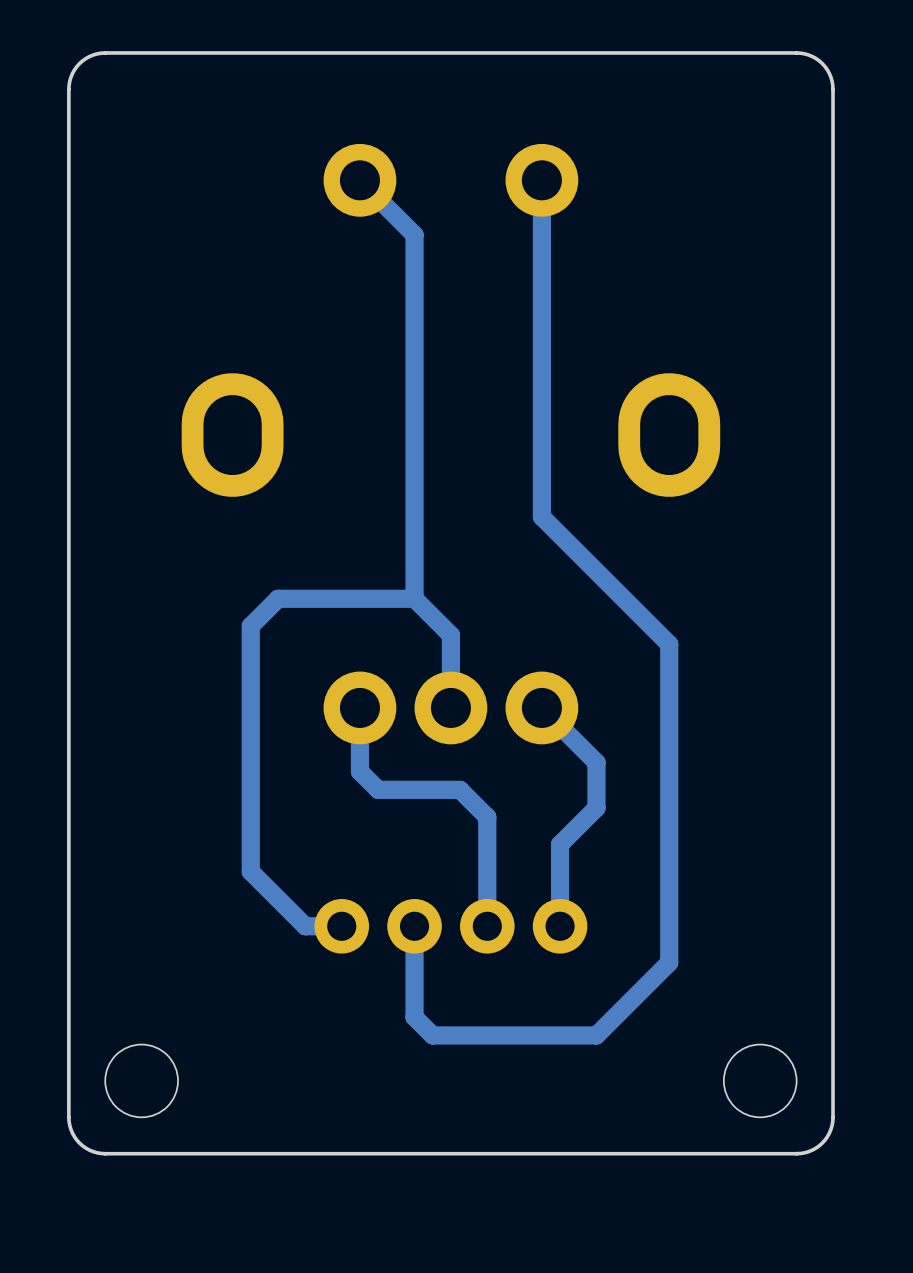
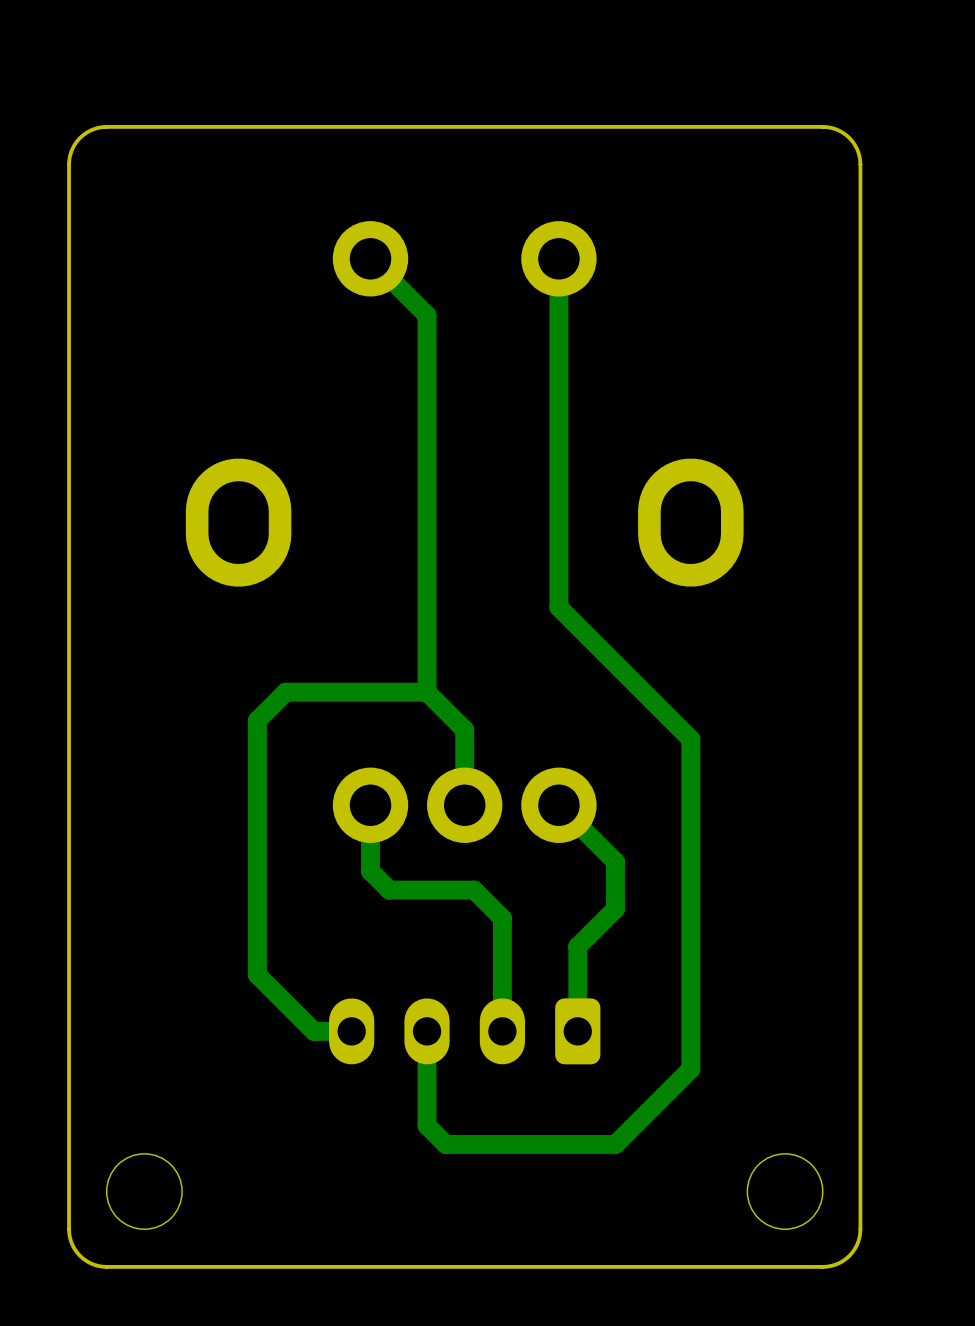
part footprint: [314, 898, 588, 954] -> [329, 998, 601, 1065]

